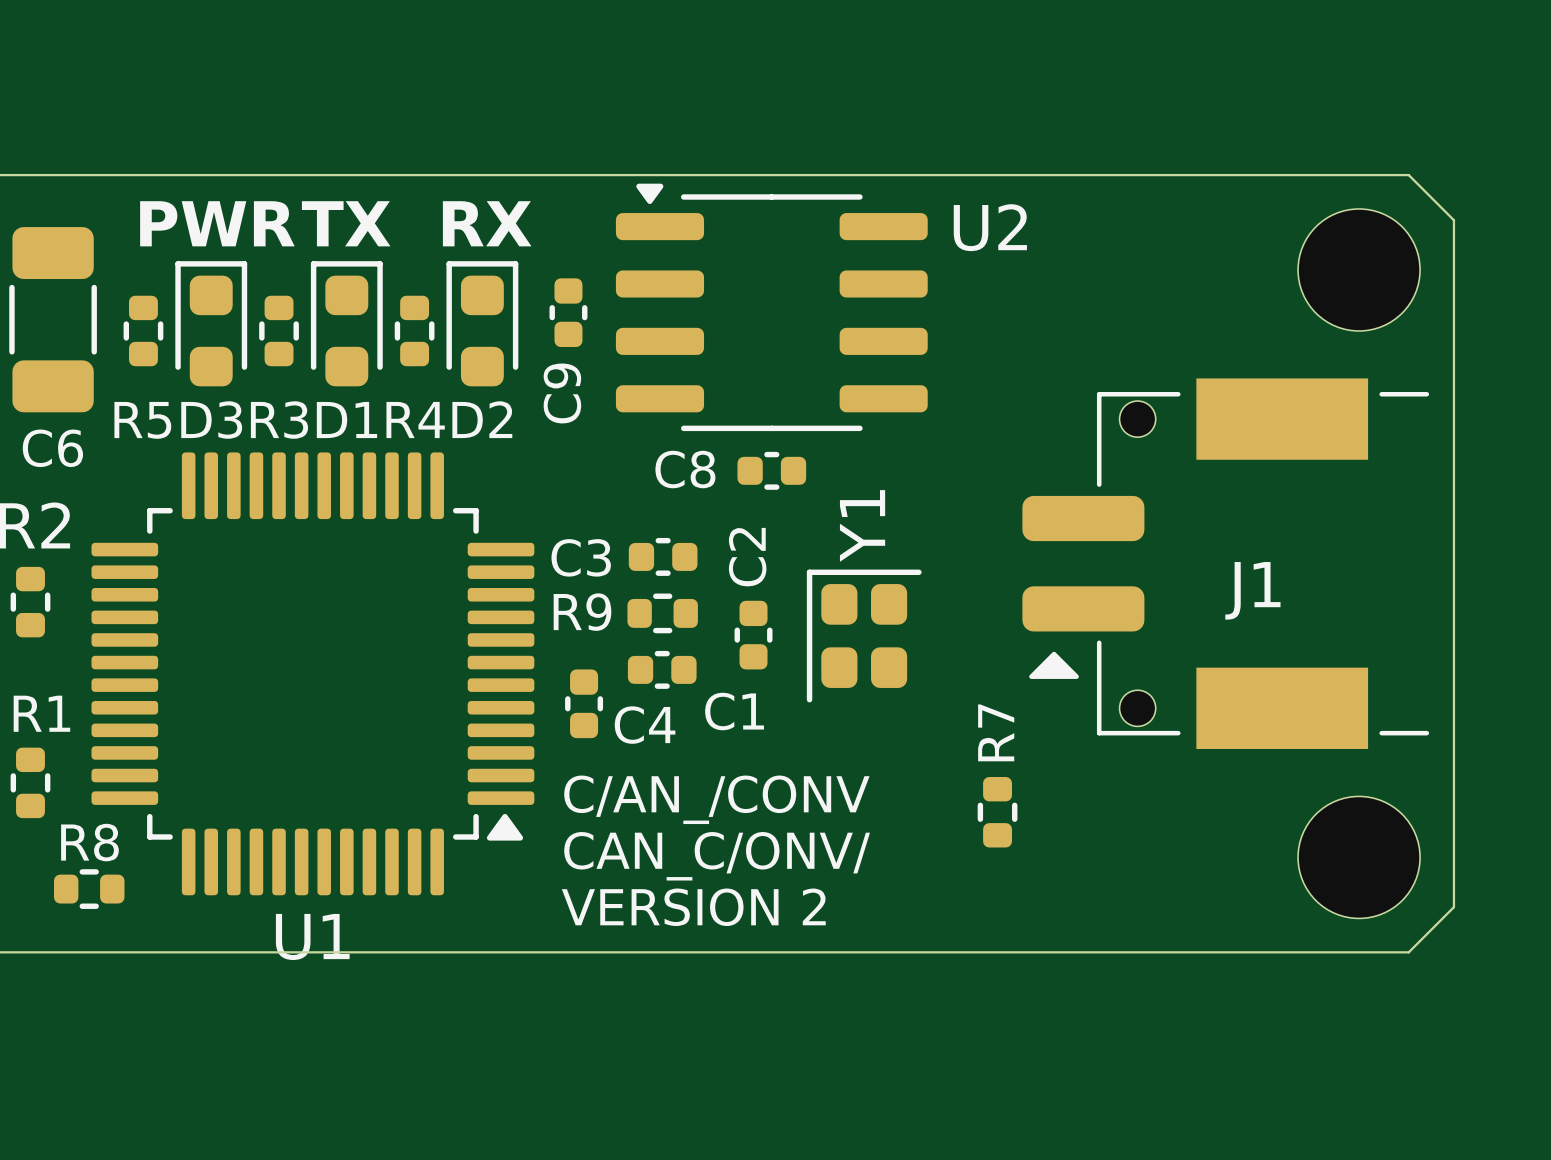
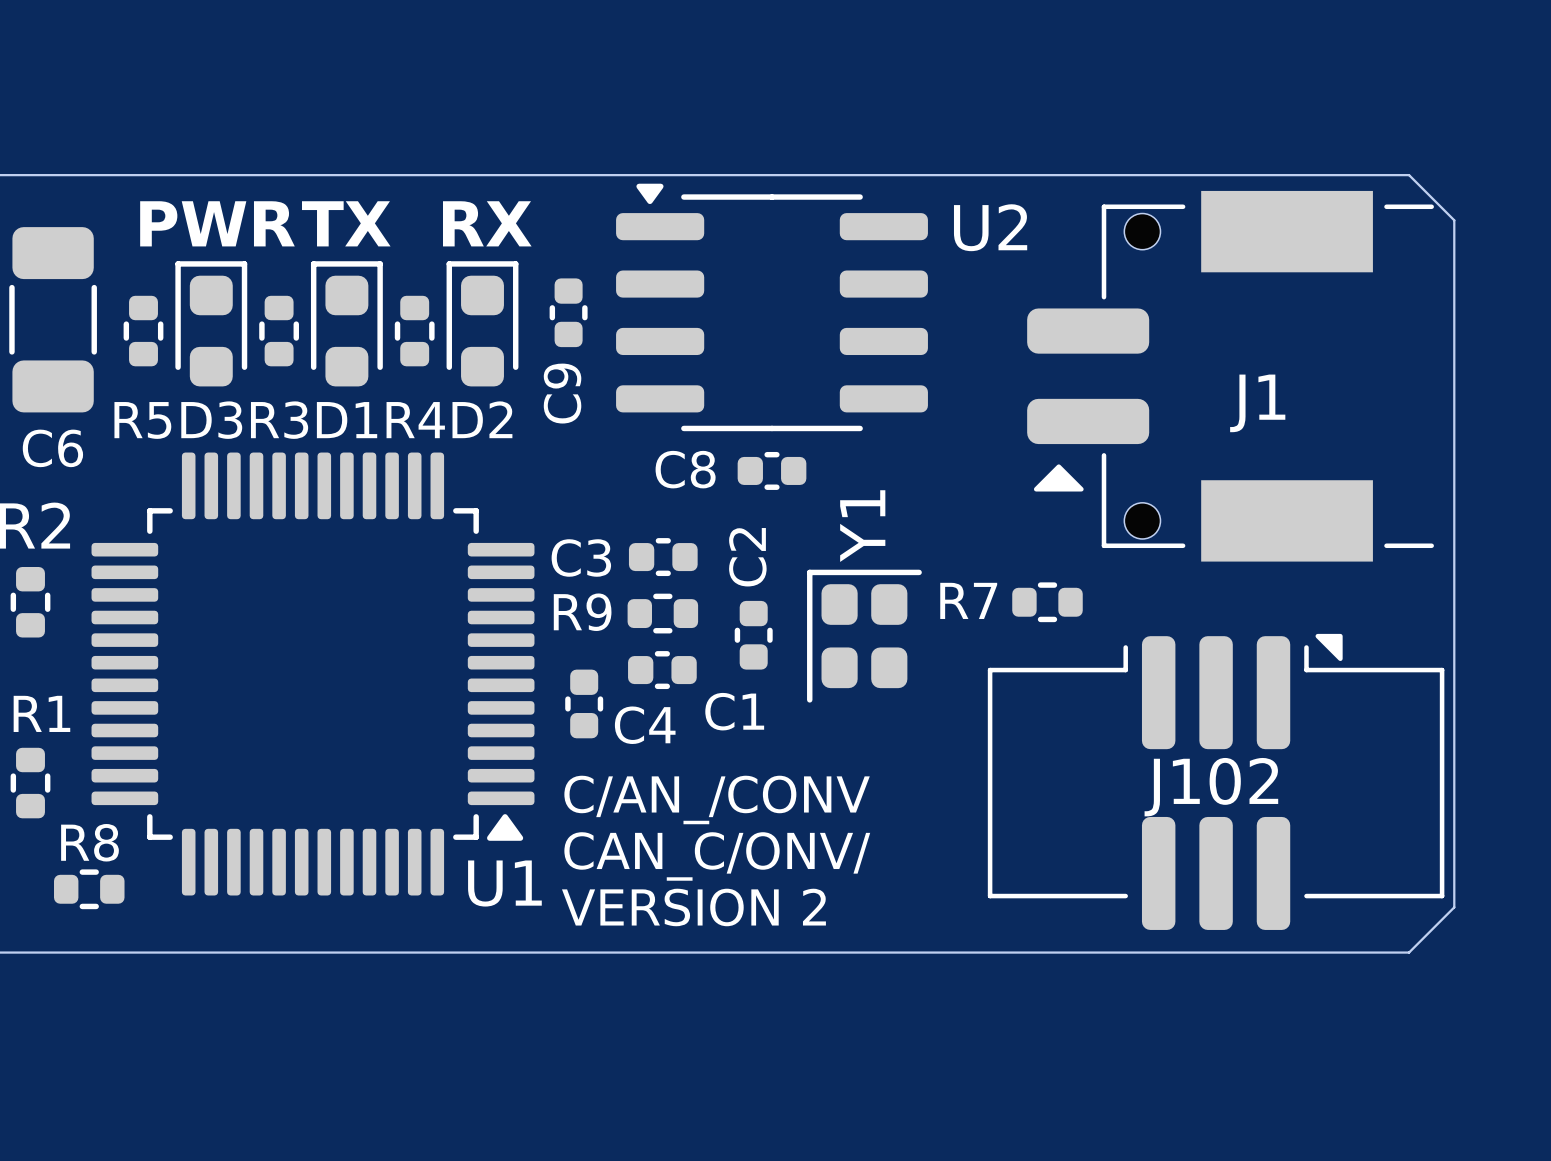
part: (1359, 269) -> none
J1 position: (1225, 563) -> (1230, 376)
R7 name position: R7 (996, 732) -> R7 (968, 600)
J102: none -> (1216, 781)
R7 rotation: 0° (997, 812) -> 90° clockwise (1047, 602)
R7 position: (997, 812) -> (1047, 602)
part: (1359, 857) -> none
U1 name position: U1 (312, 936) -> U1 (504, 883)

